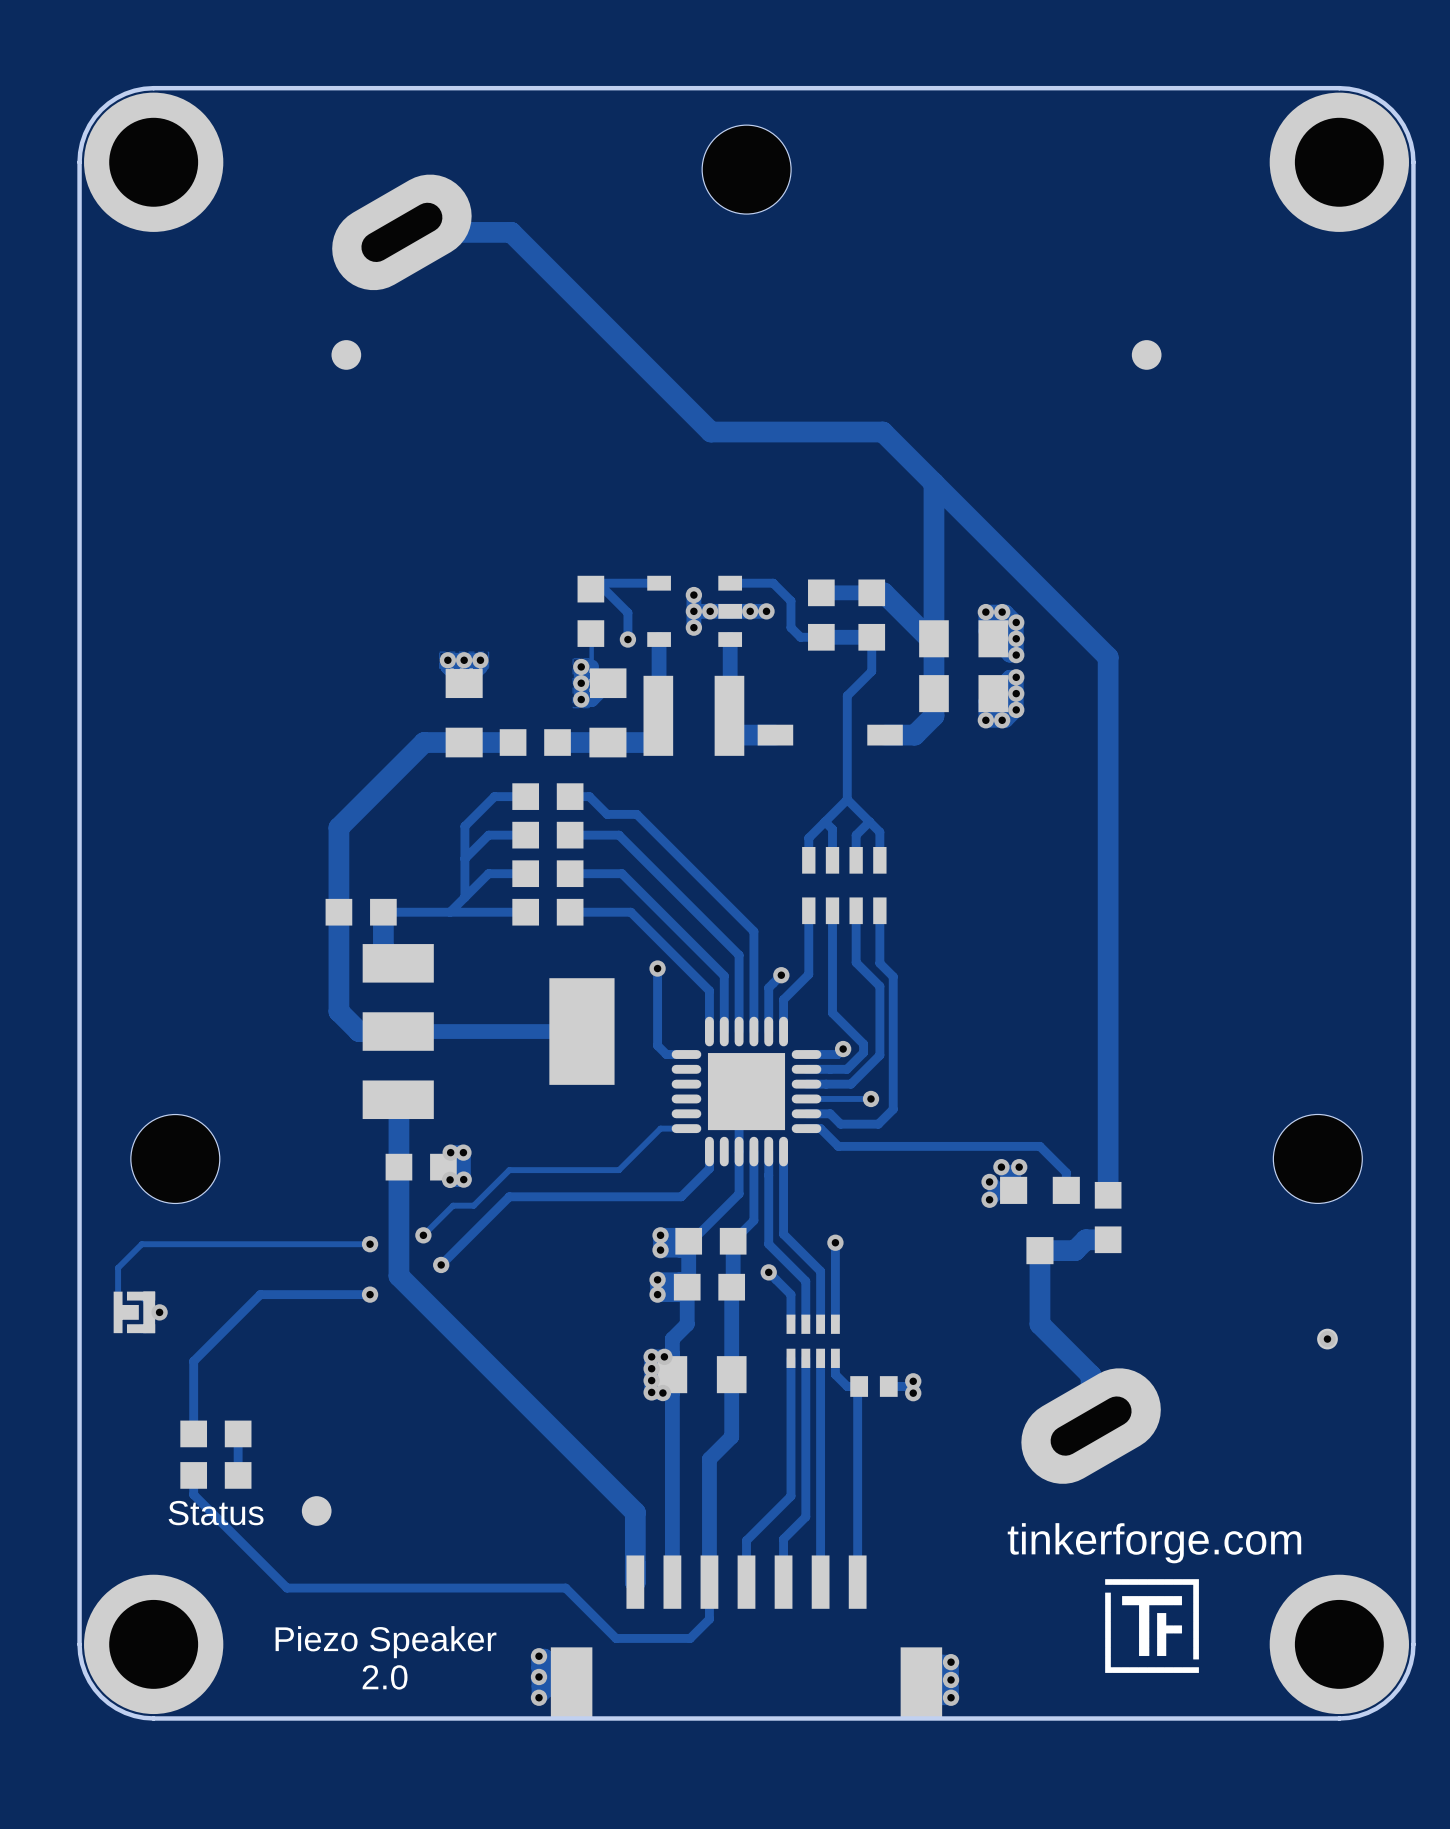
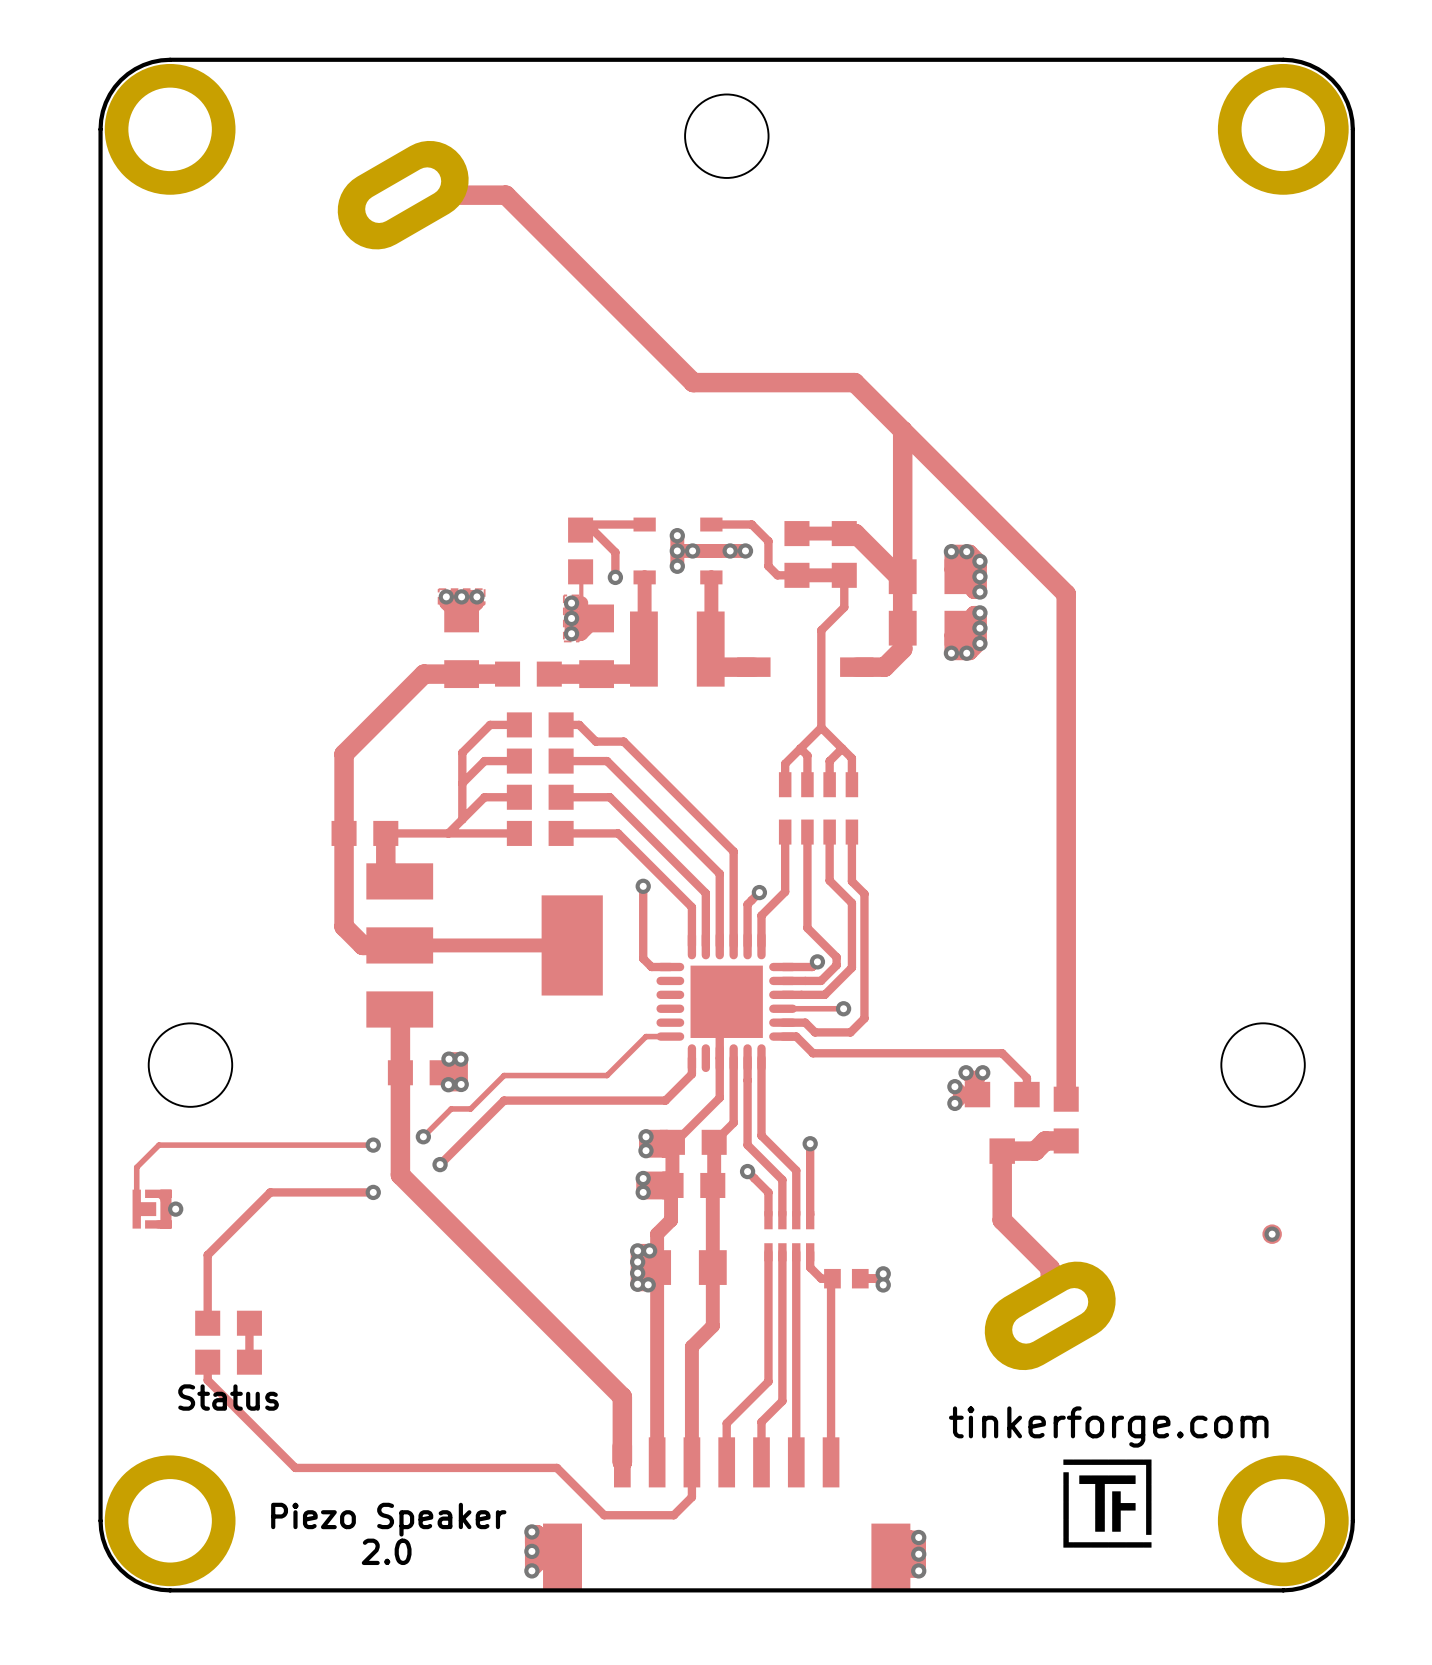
part: (346, 354) -> none
part: (1146, 354) -> none
part: (316, 1511) -> none

